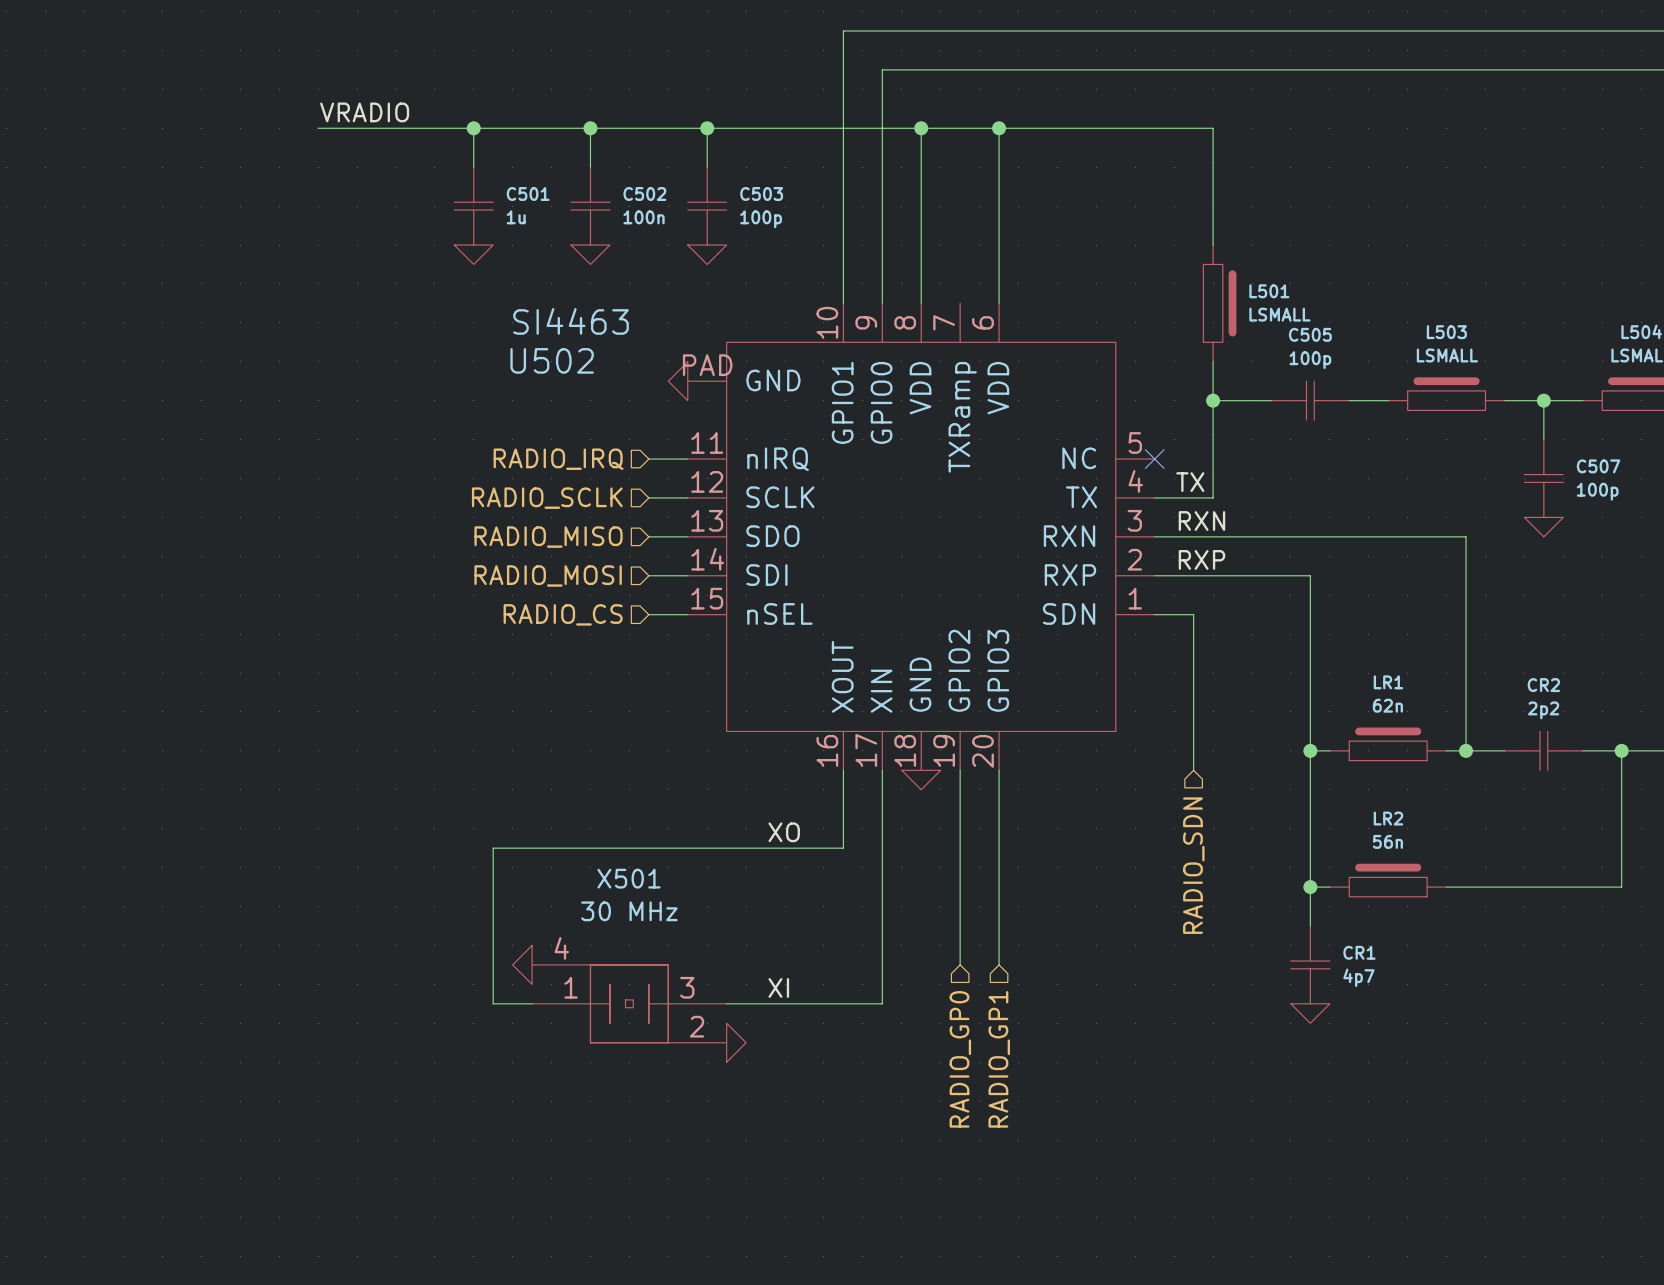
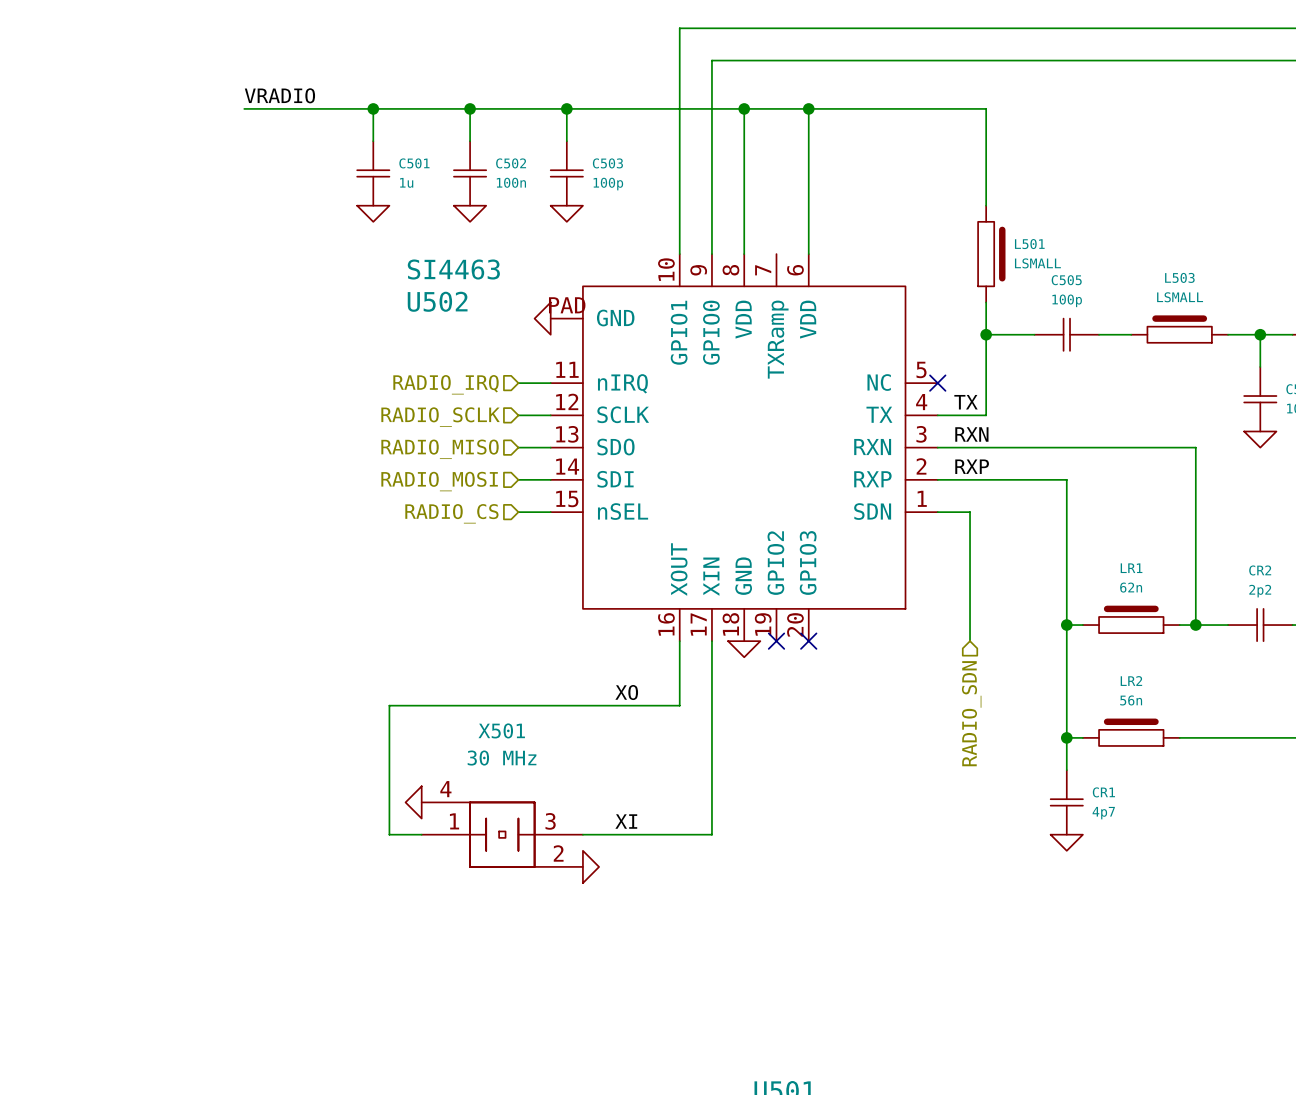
wire: (960, 770) (960, 964) -> none
no-connect mark: none -> (776, 641)
wire: (999, 770) (999, 964) -> none
no-connect mark: none -> (808, 641)
hierarchical label: RADIO_GP0 (960, 1059) -> none
hierarchical label: RADIO_GP1 (999, 1059) -> none

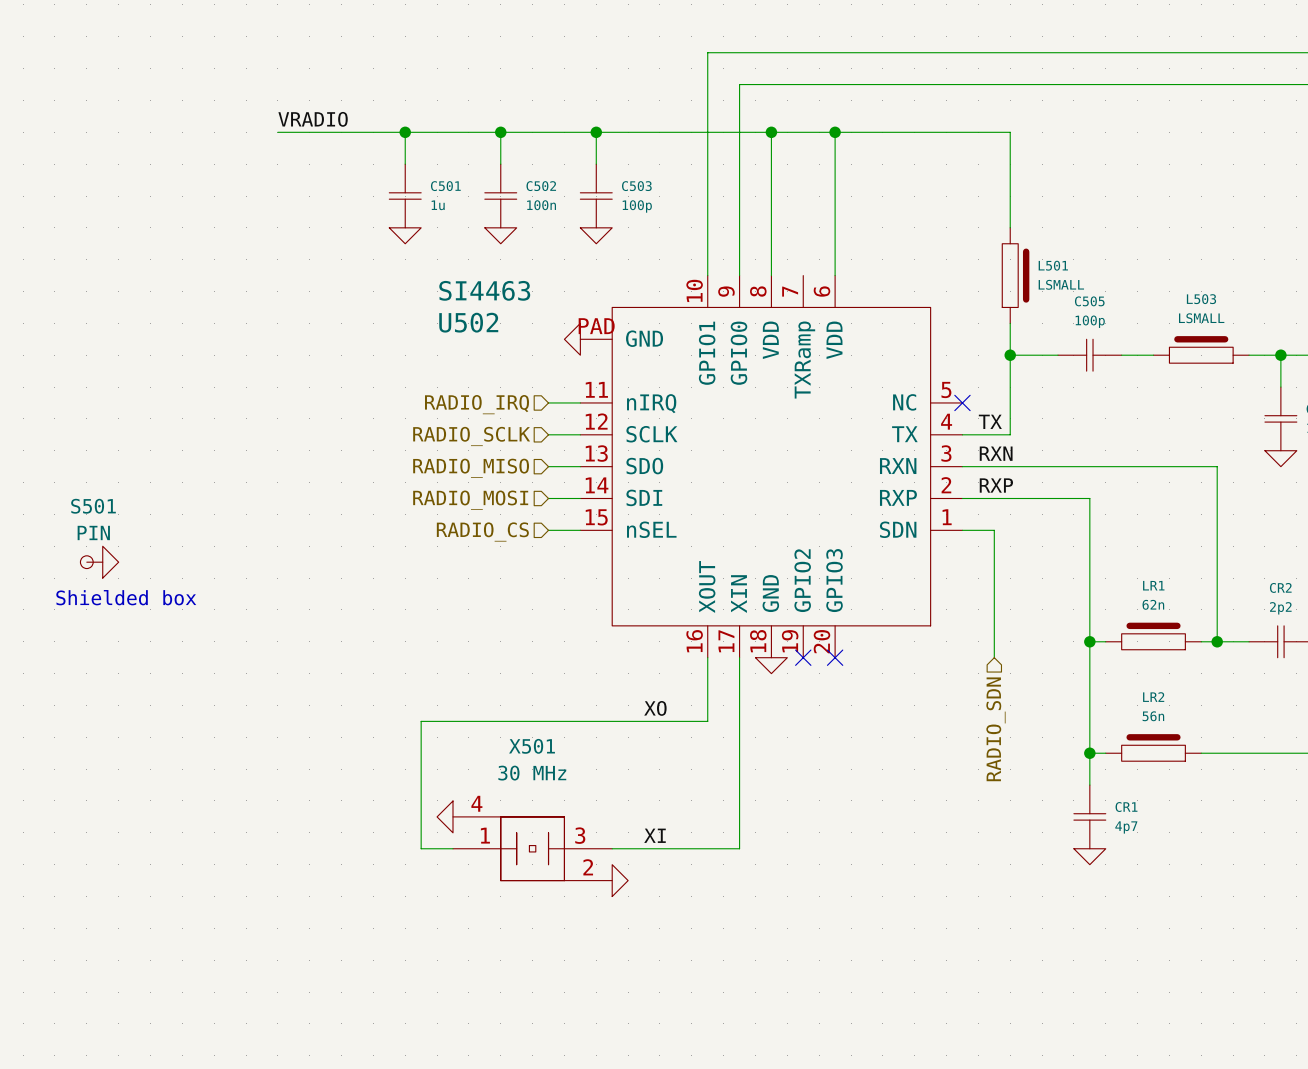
S501: none -> PIN (91, 562)
power symbol: none -> (110, 562)
text: none -> Shielded box (126, 597)

